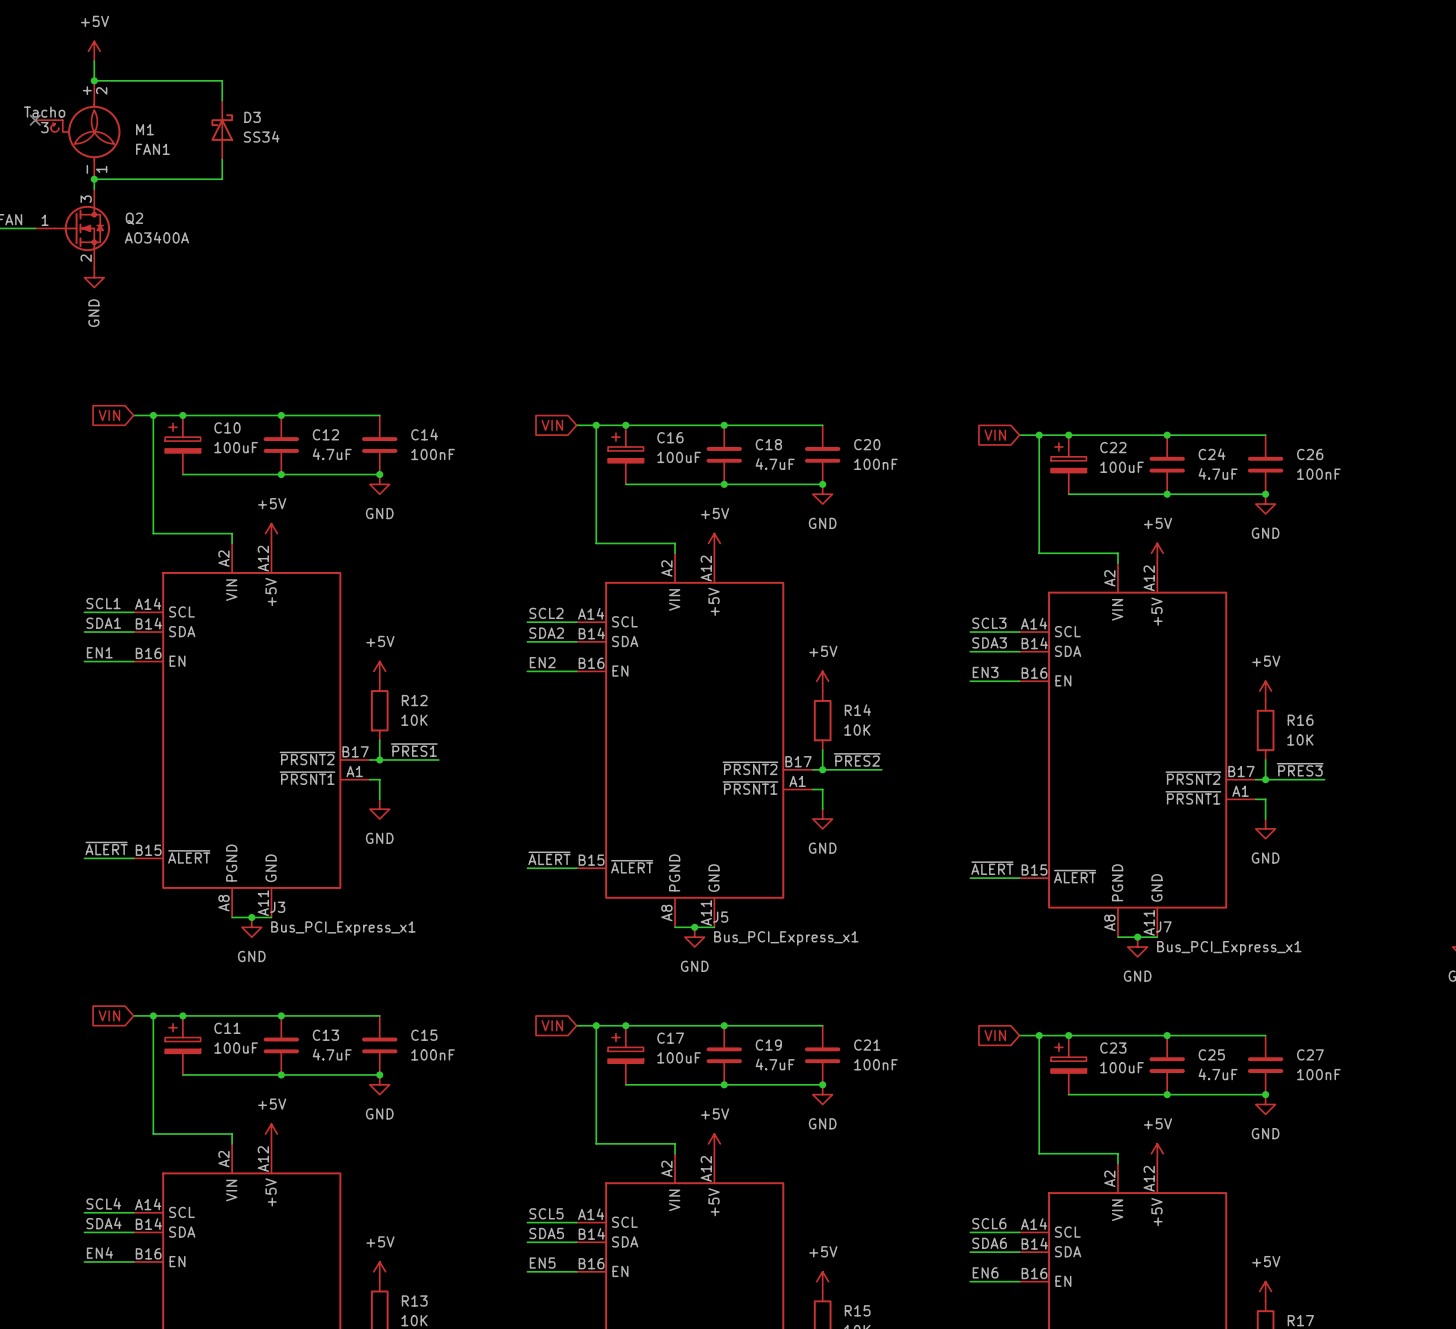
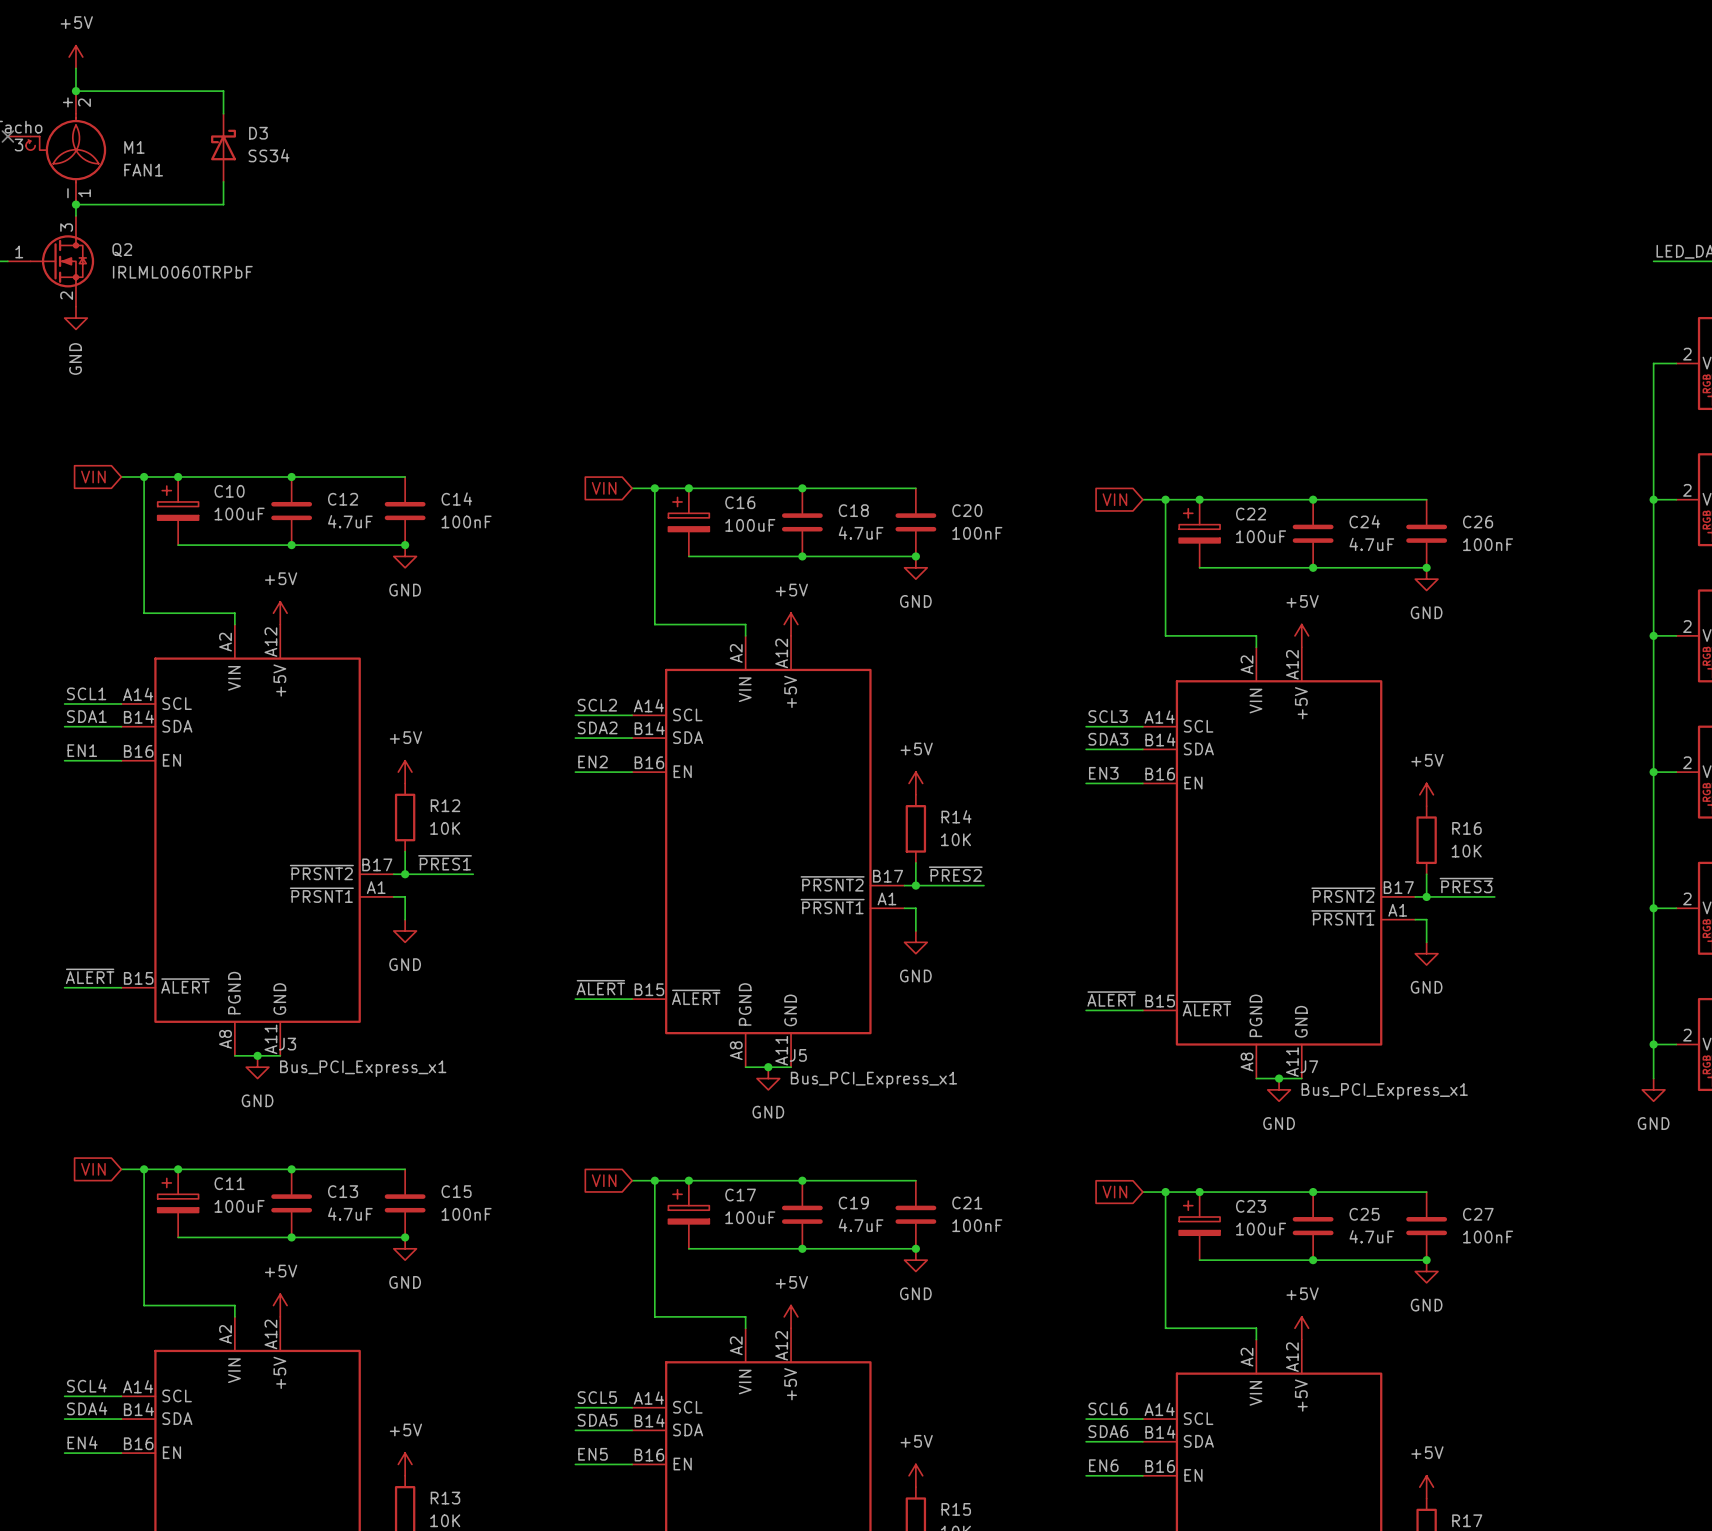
Q2 value: AO3400A (156, 237) -> IRLML0060TRPbF (182, 272)

